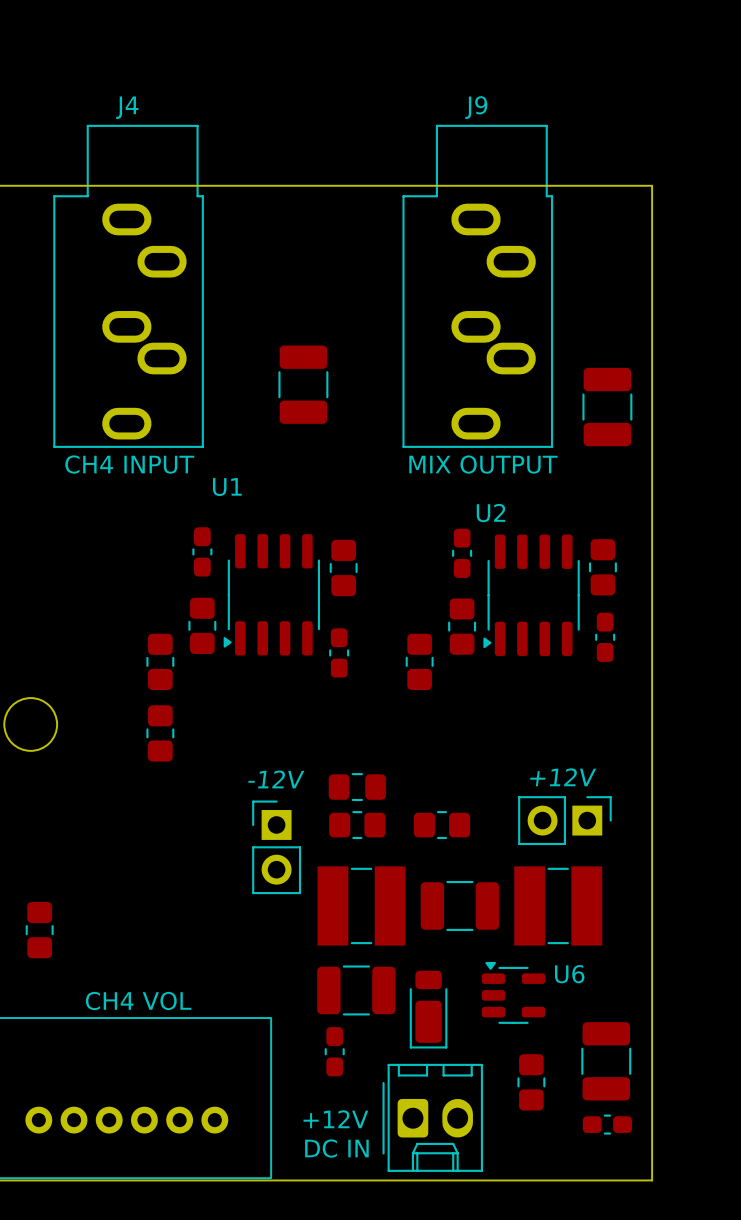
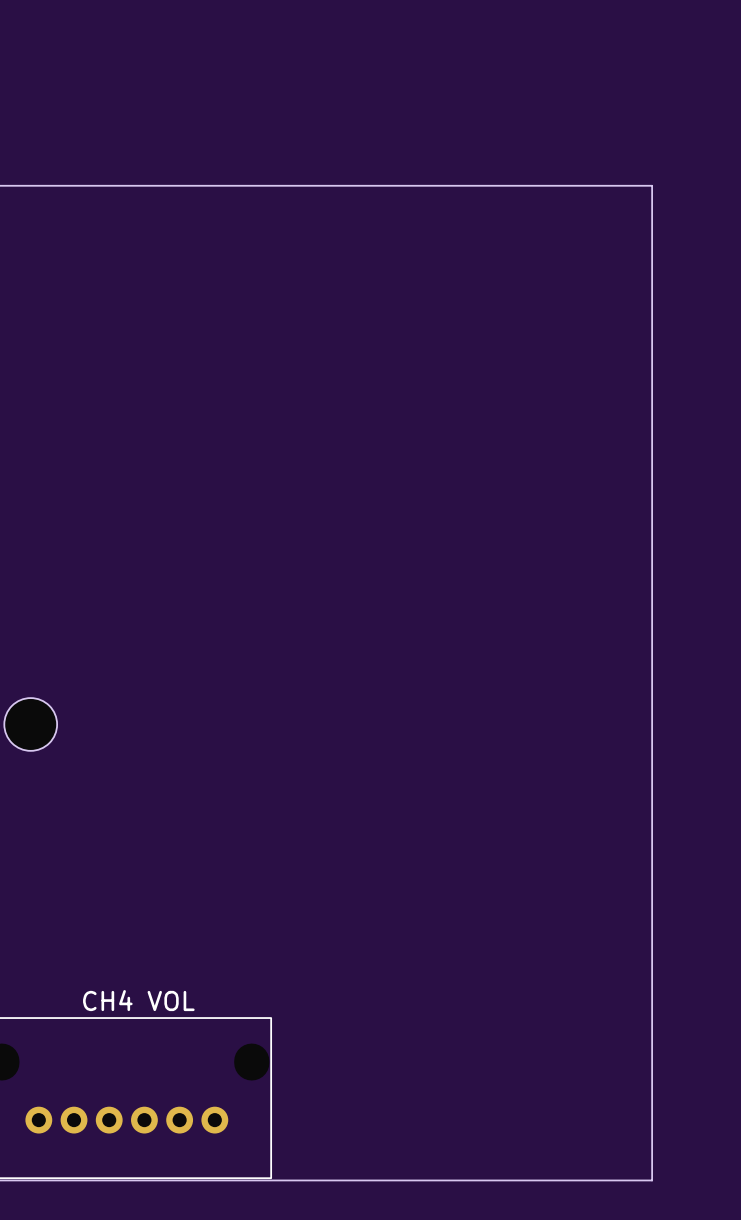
J4: (128, 286) -> none
J9: (477, 286) -> none
part: (303, 384) -> none
part: (607, 407) -> none
part: (202, 551) -> none
part: (462, 553) -> none
part: (602, 567) -> none
part: (343, 568) -> none
U1: (271, 594) -> none
U2: (531, 595) -> none
part: (202, 625) -> none
part: (462, 626) -> none
part: (605, 637) -> none
part: (339, 652) -> none
part: (160, 661) -> none
part: (419, 661) -> none
part: (160, 733) -> none
part: (357, 787) -> none
part: (564, 820) -> none
part: (357, 825) -> none
part: (441, 825) -> none
part: (276, 847) -> none
part: (361, 905) -> none
part: (459, 905) -> none
part: (558, 905) -> none
part: (39, 930) -> none
part: (356, 990) -> none
U6: (513, 992) -> none
part: (428, 1009) -> none
part: (334, 1051) -> none
part: (606, 1061) -> none
part: (531, 1082) -> none
part: (432, 1117) -> none
part: (607, 1124) -> none

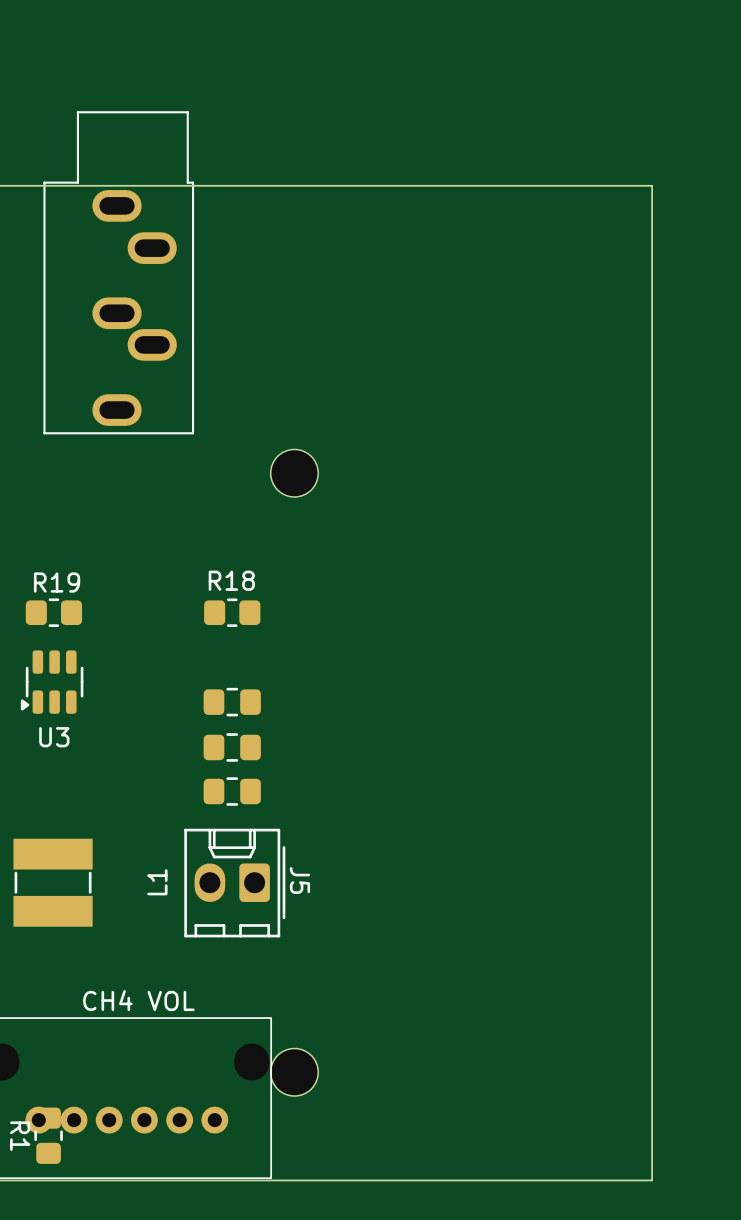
part: none -> (118, 272)
part: none -> (294, 473)
R19: none -> (53, 612)
R18: none -> (232, 612)
U3: none -> (52, 682)
part: none -> (232, 702)
part: (30, 724) -> none
part: none -> (232, 747)
part: none -> (232, 791)
L1: none -> (53, 882)
J5: none -> (234, 883)
part: none -> (294, 1072)
R1: none -> (48, 1135)

